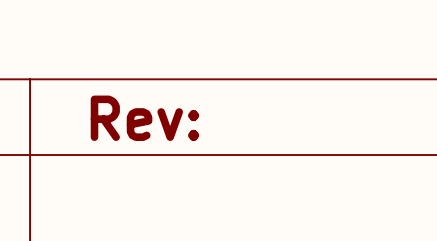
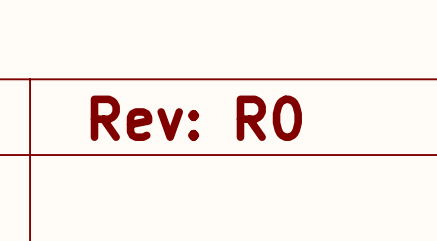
title block: Rev: (144, 118) -> Rev: R0 (196, 118)

